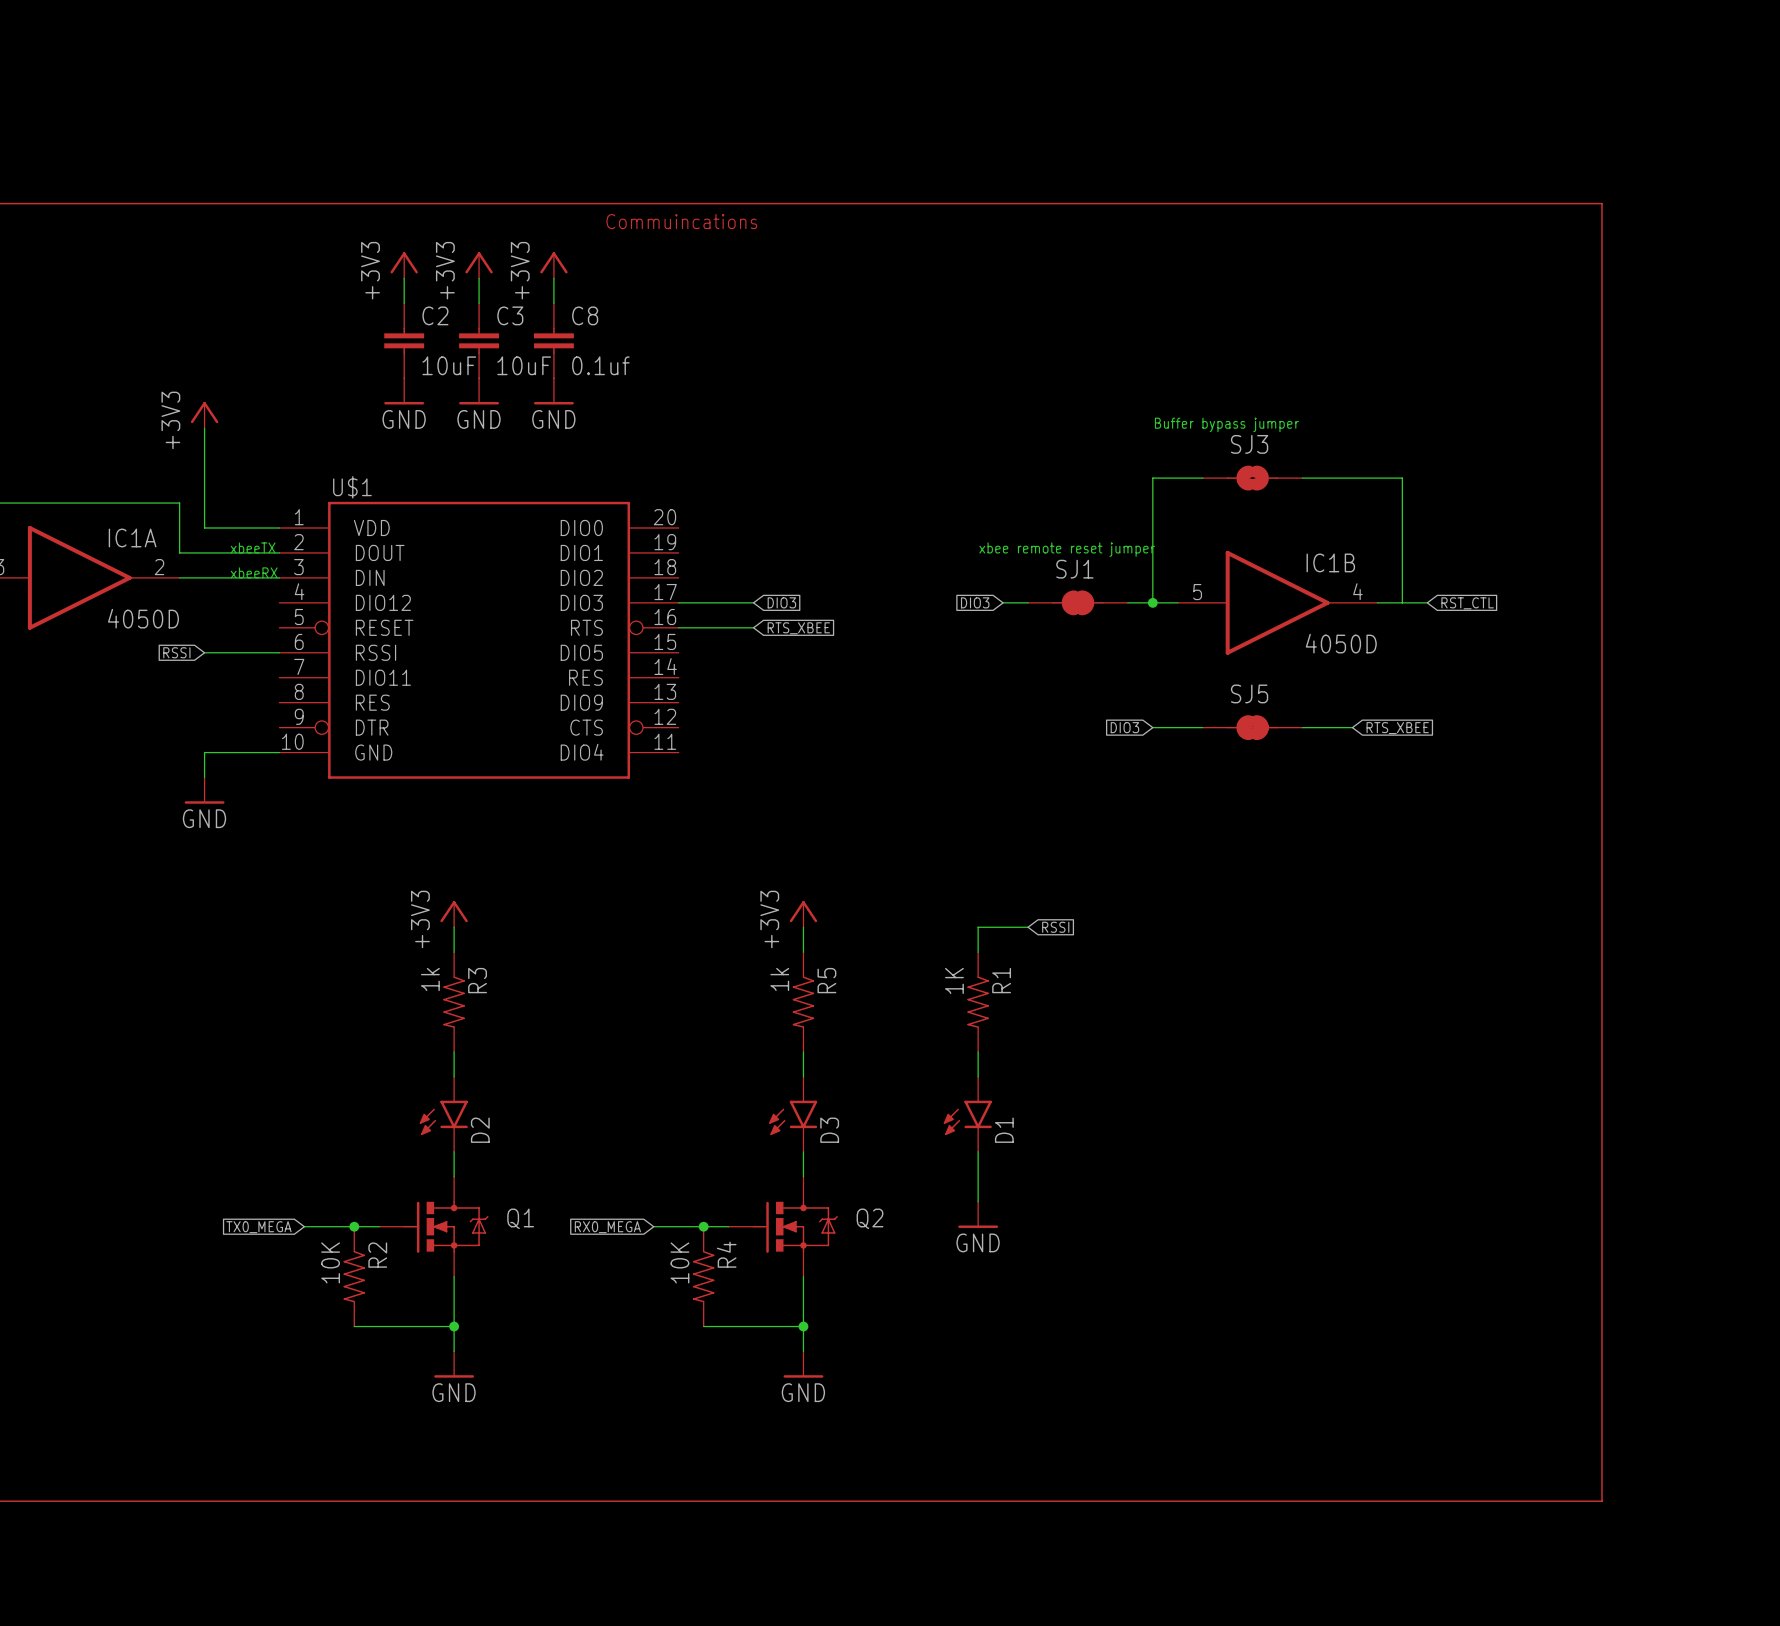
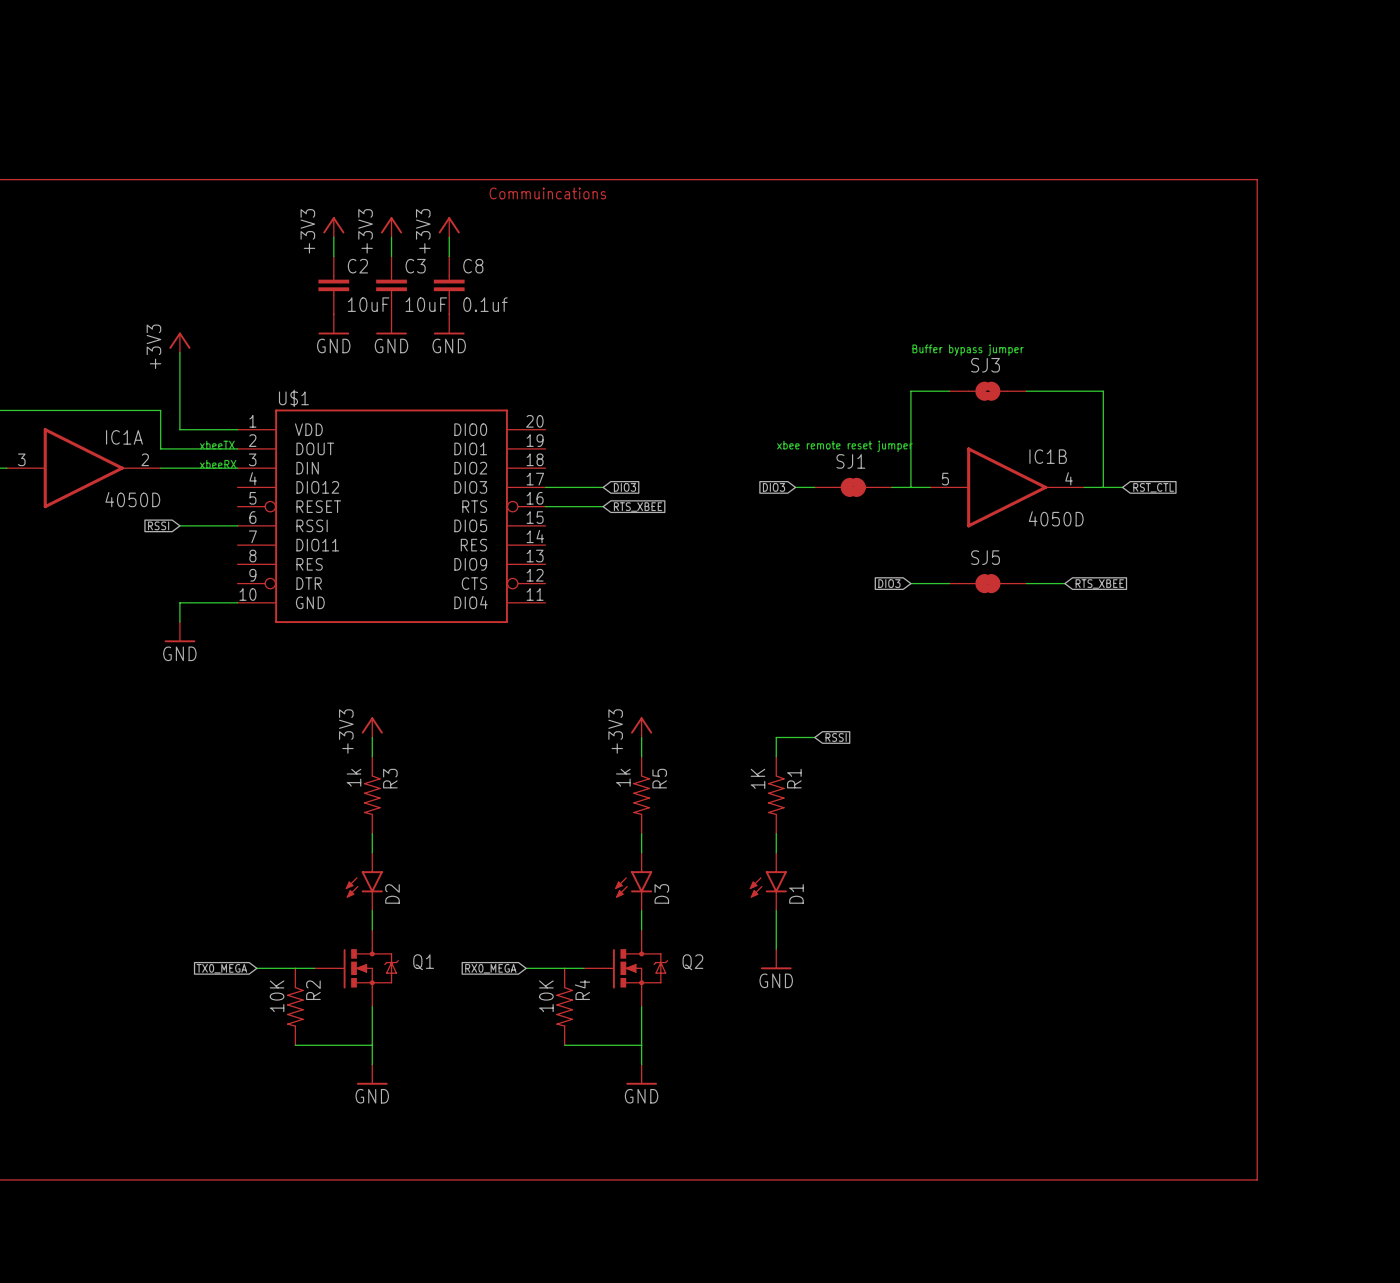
junction: (1152, 602) -> none
junction: (354, 1226) -> none
junction: (703, 1226) -> none
junction: (454, 1326) -> none
junction: (803, 1326) -> none

